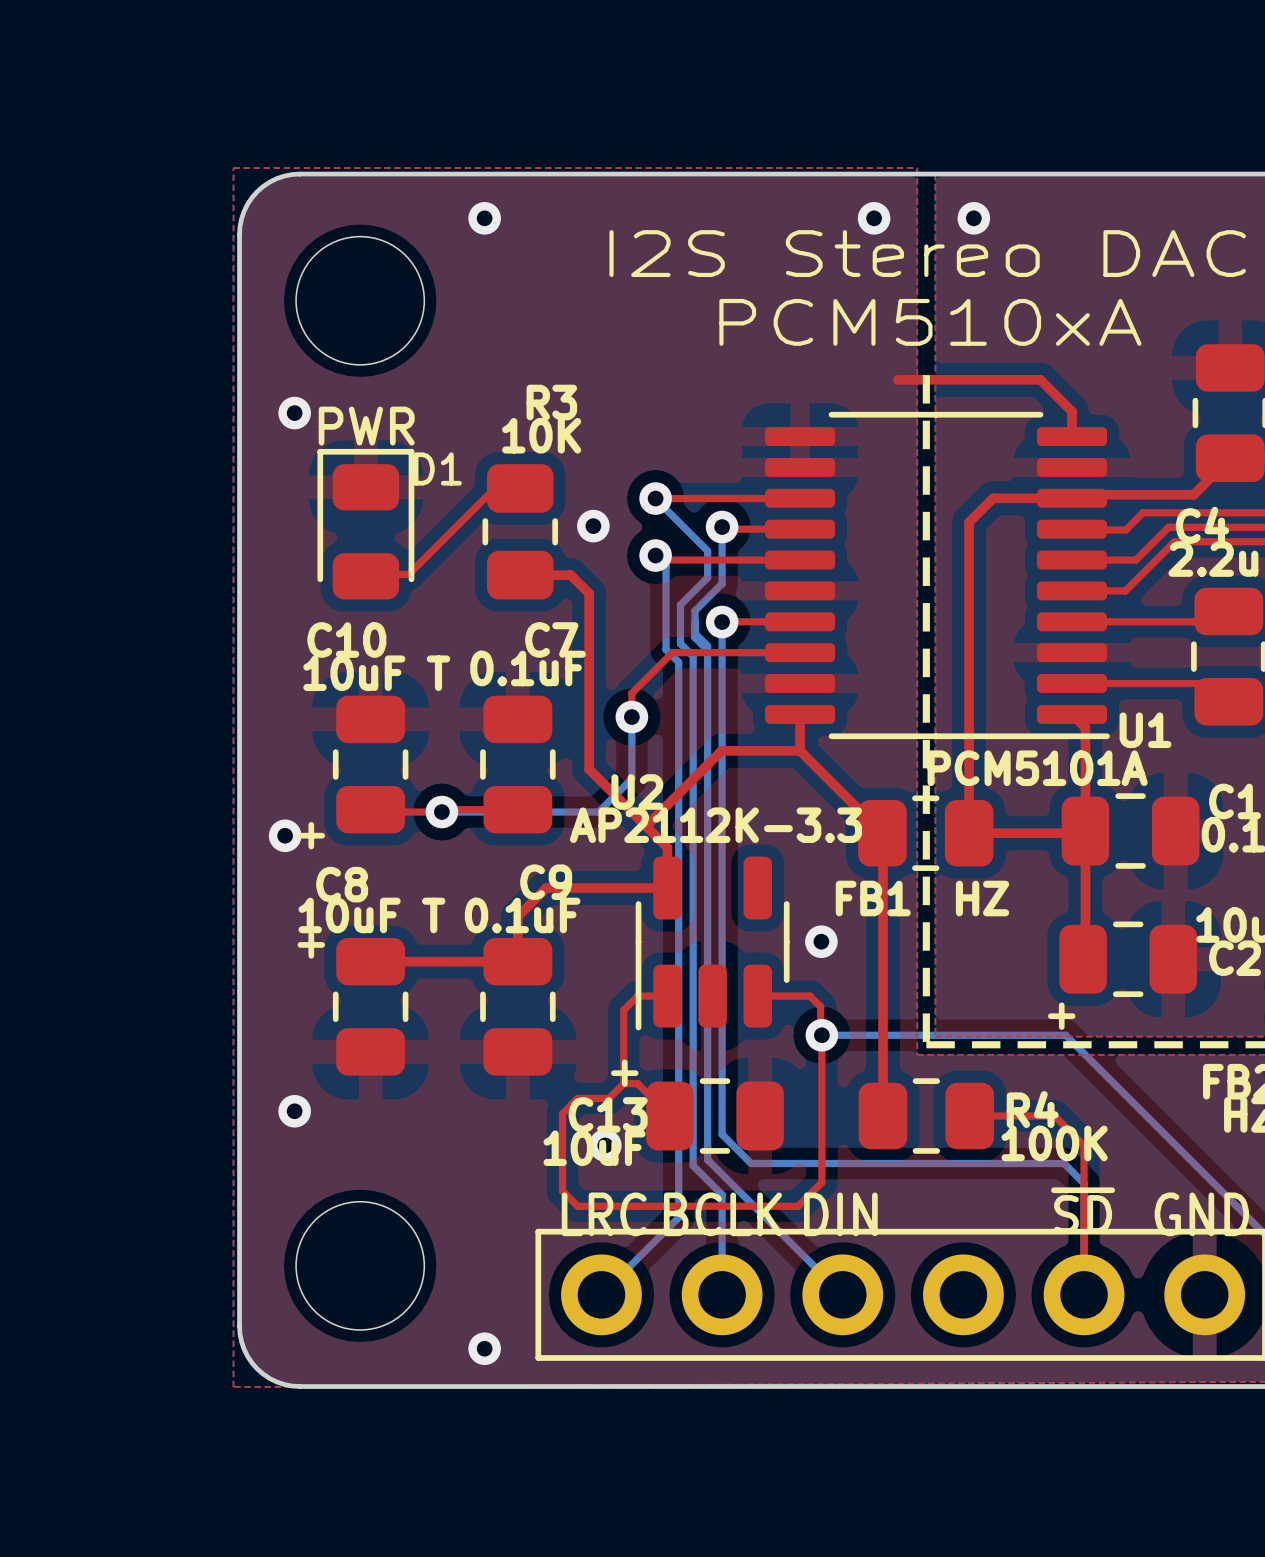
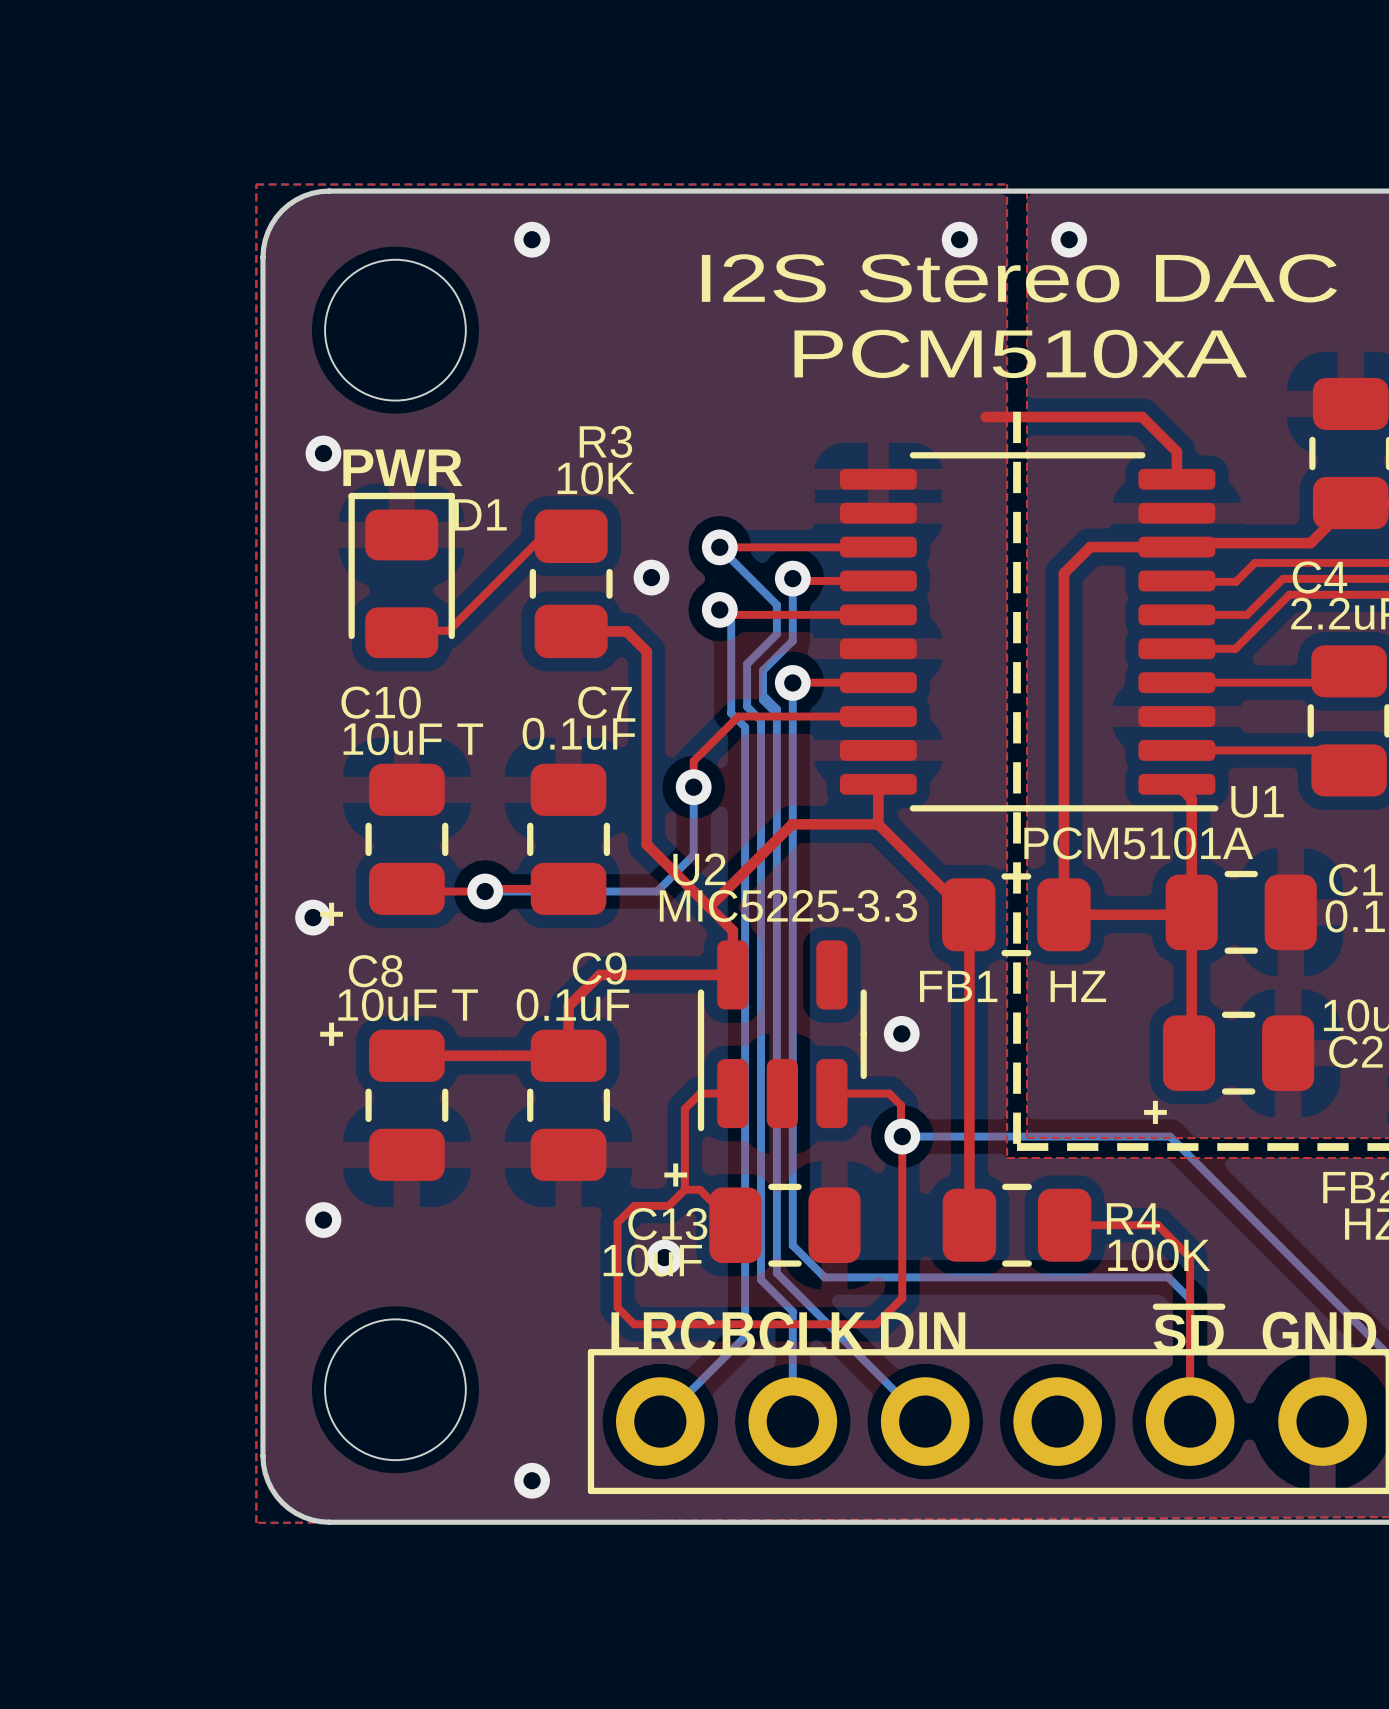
U2 value: AP2112K-3.3 (716, 825) -> MIC5225-3.3 (788, 905)

